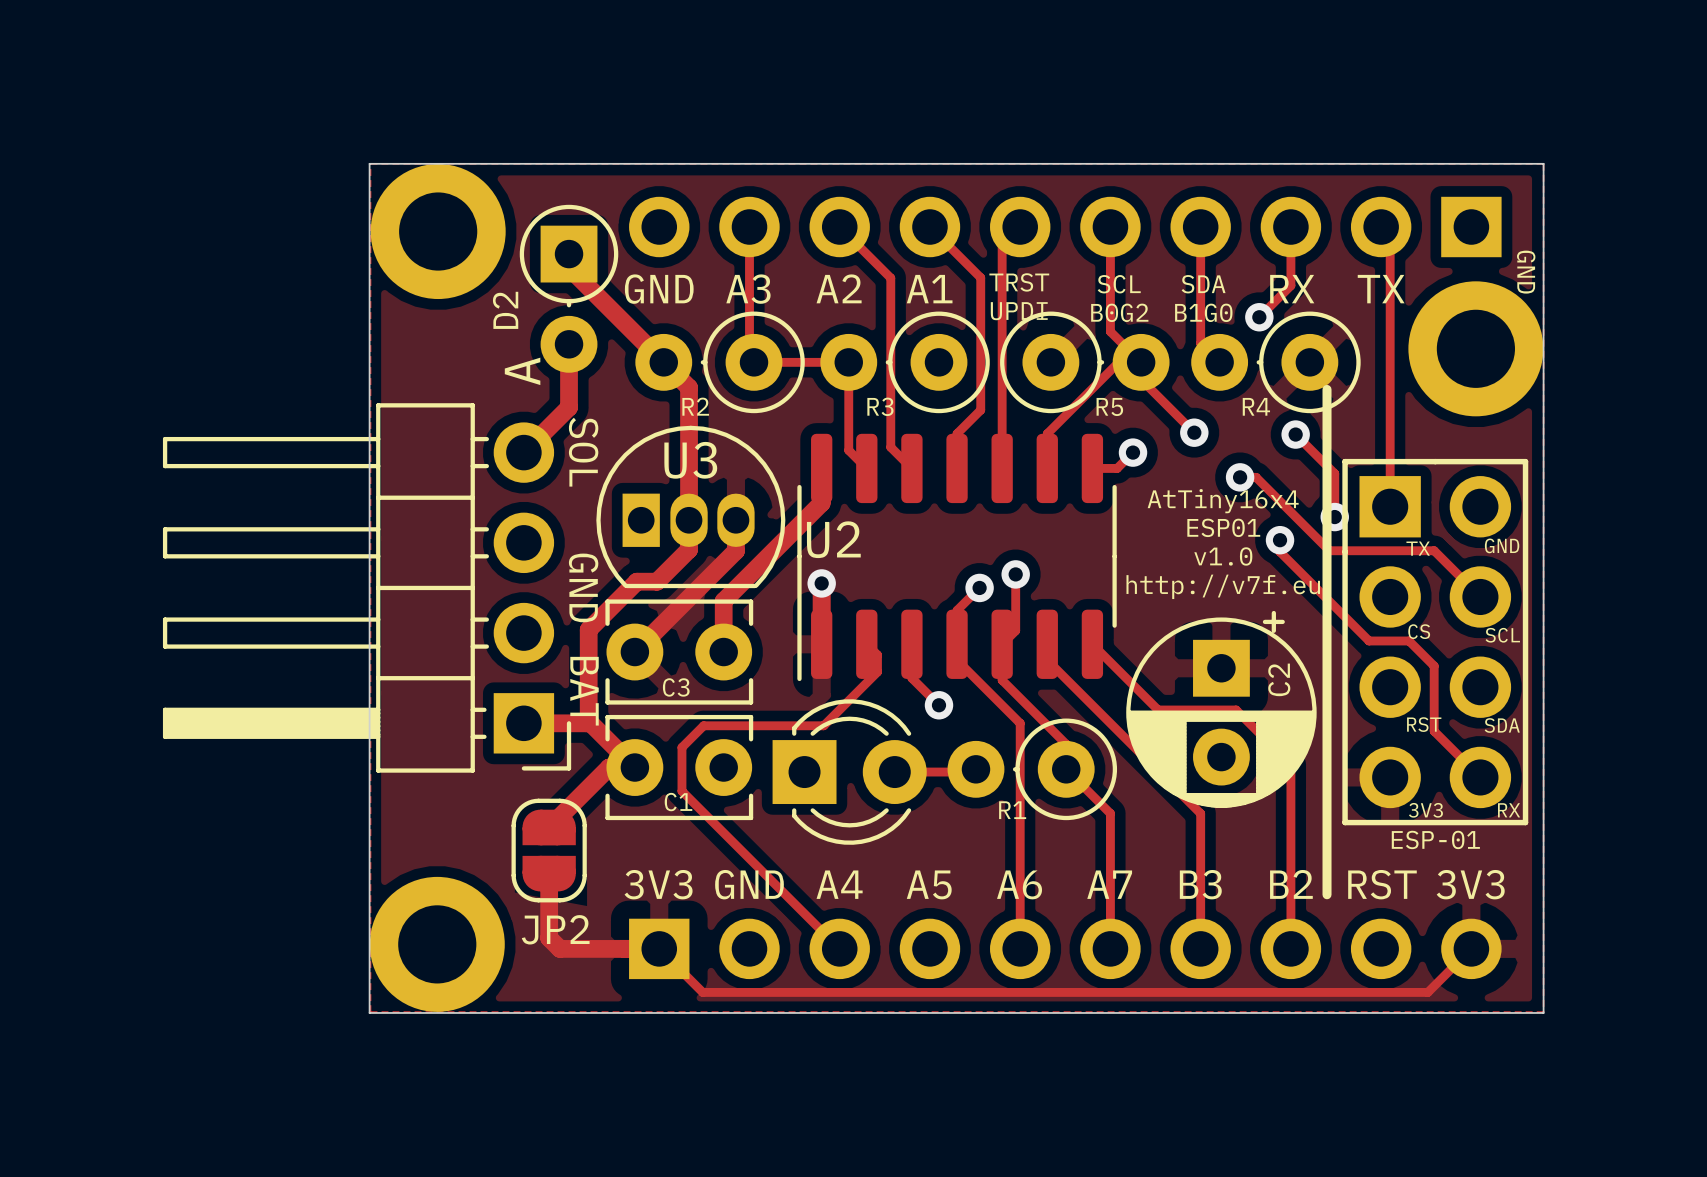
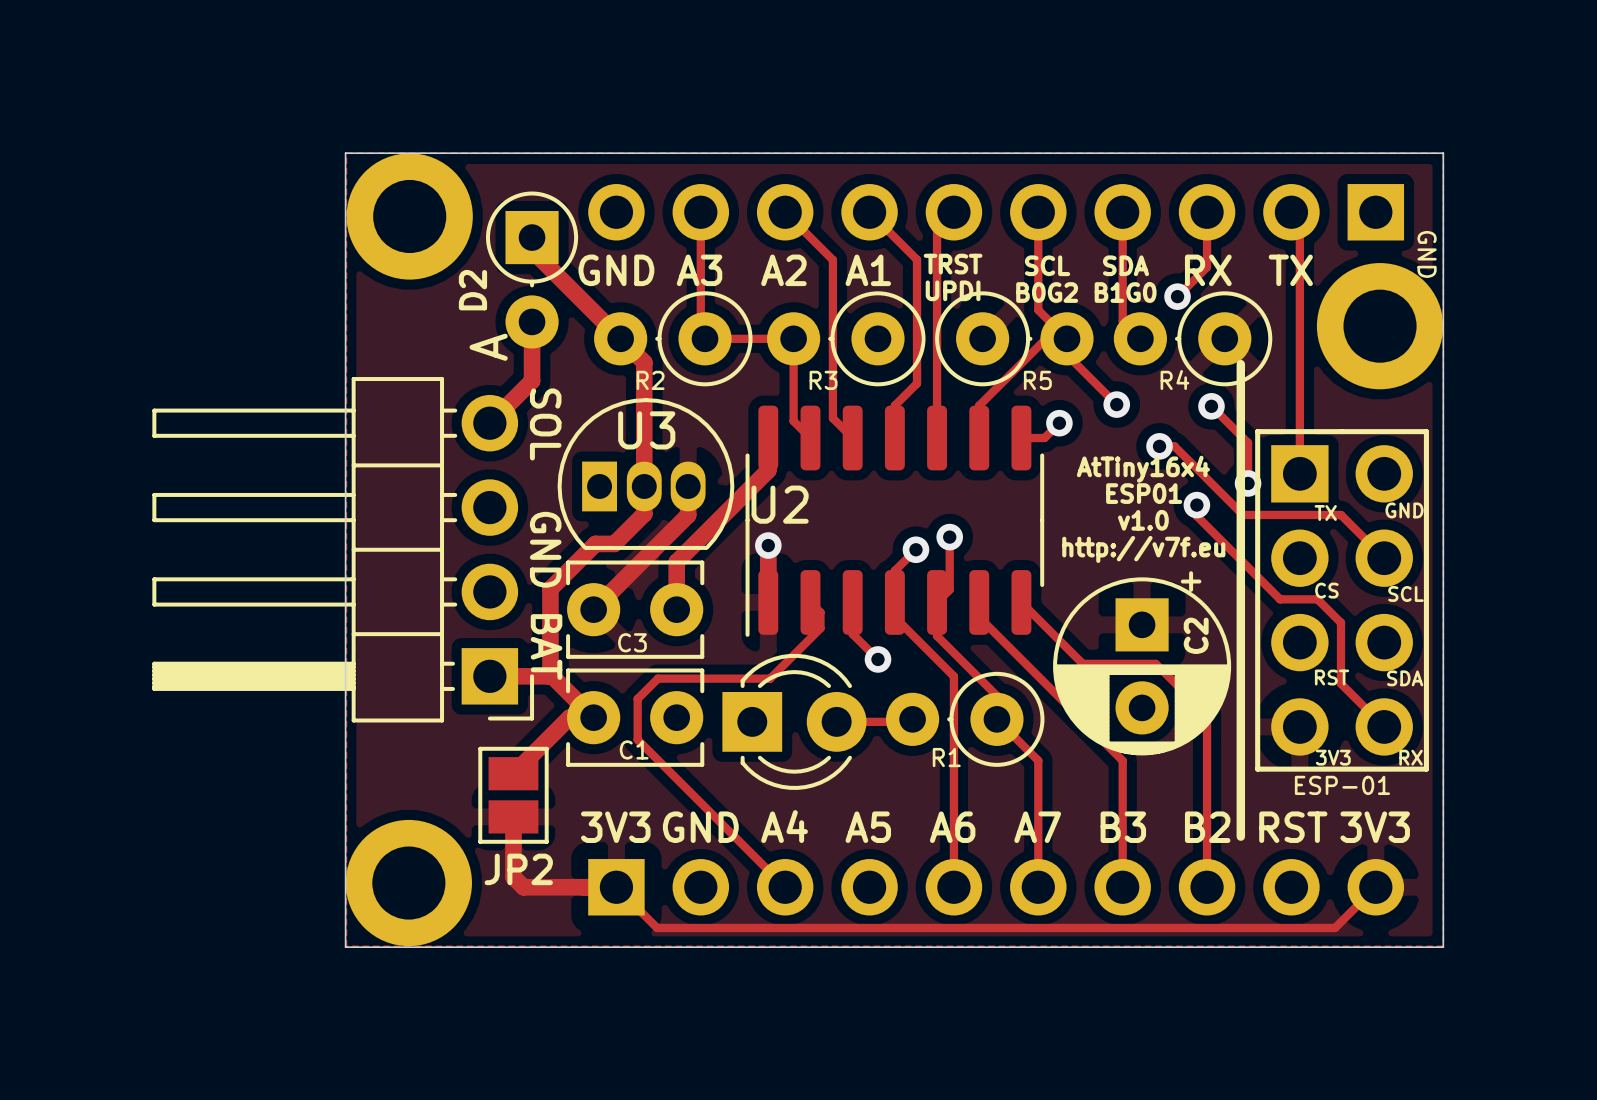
JP2 footprint: [511, 798, 587, 903] -> [478, 746, 549, 844]

